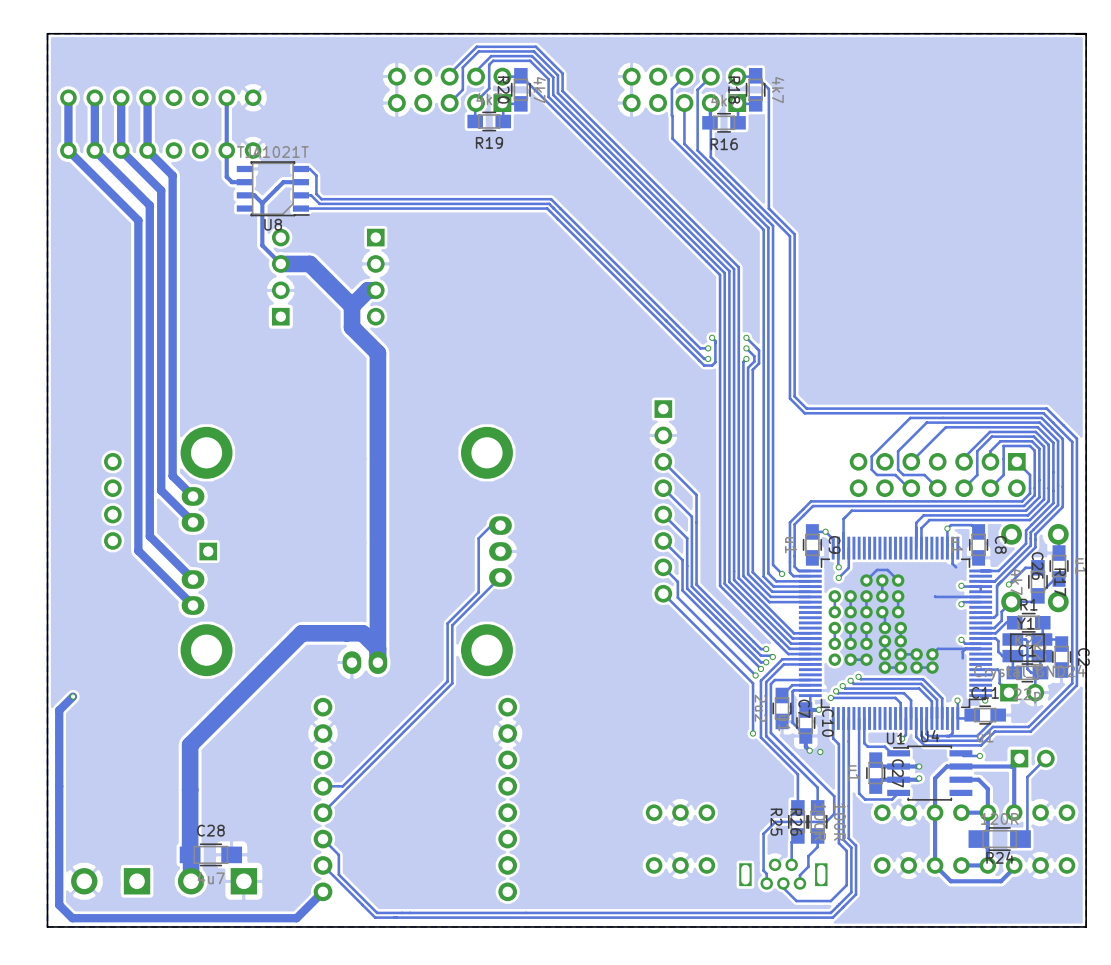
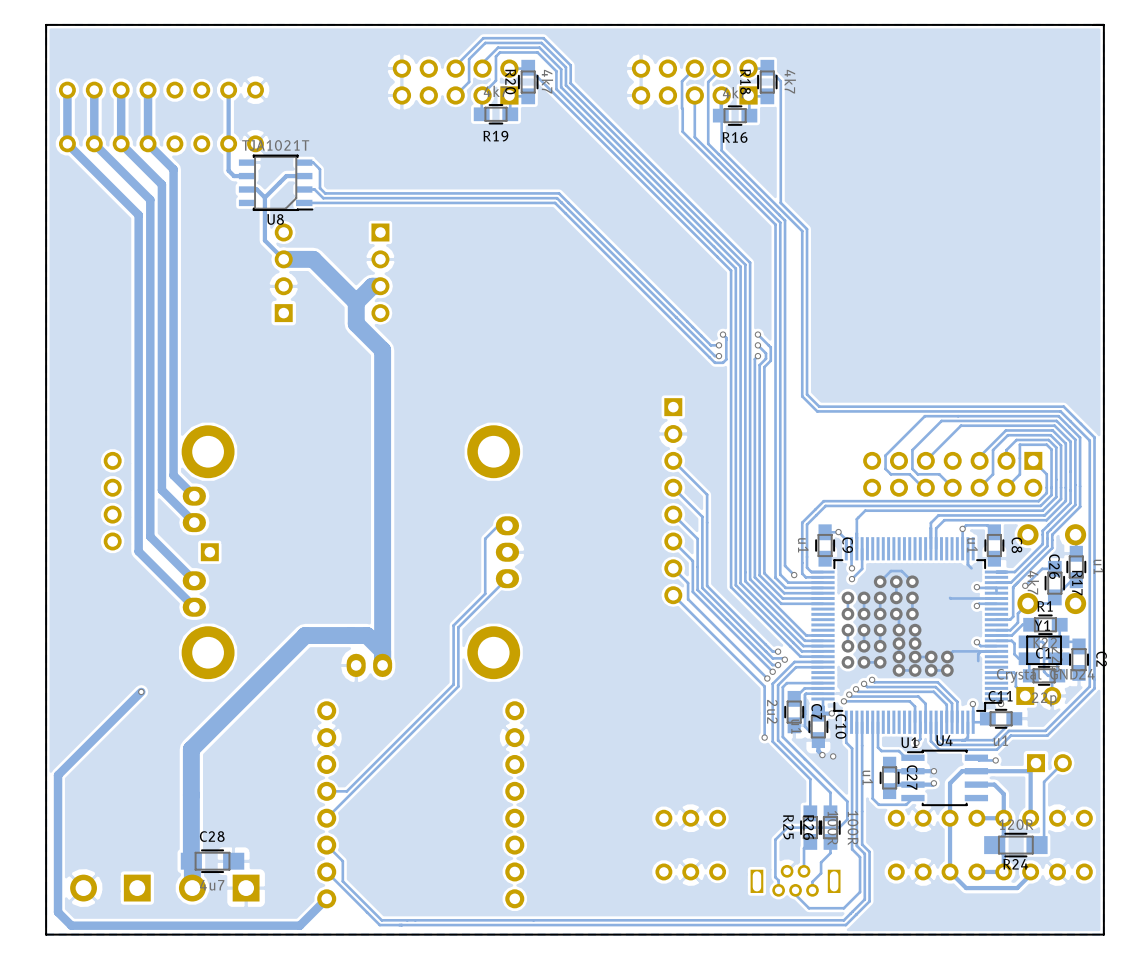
via: none -> (141, 691)
track: (73, 696) (59, 710) (59, 770) -> (141, 691) (58, 775)
via: (73, 696) -> none

